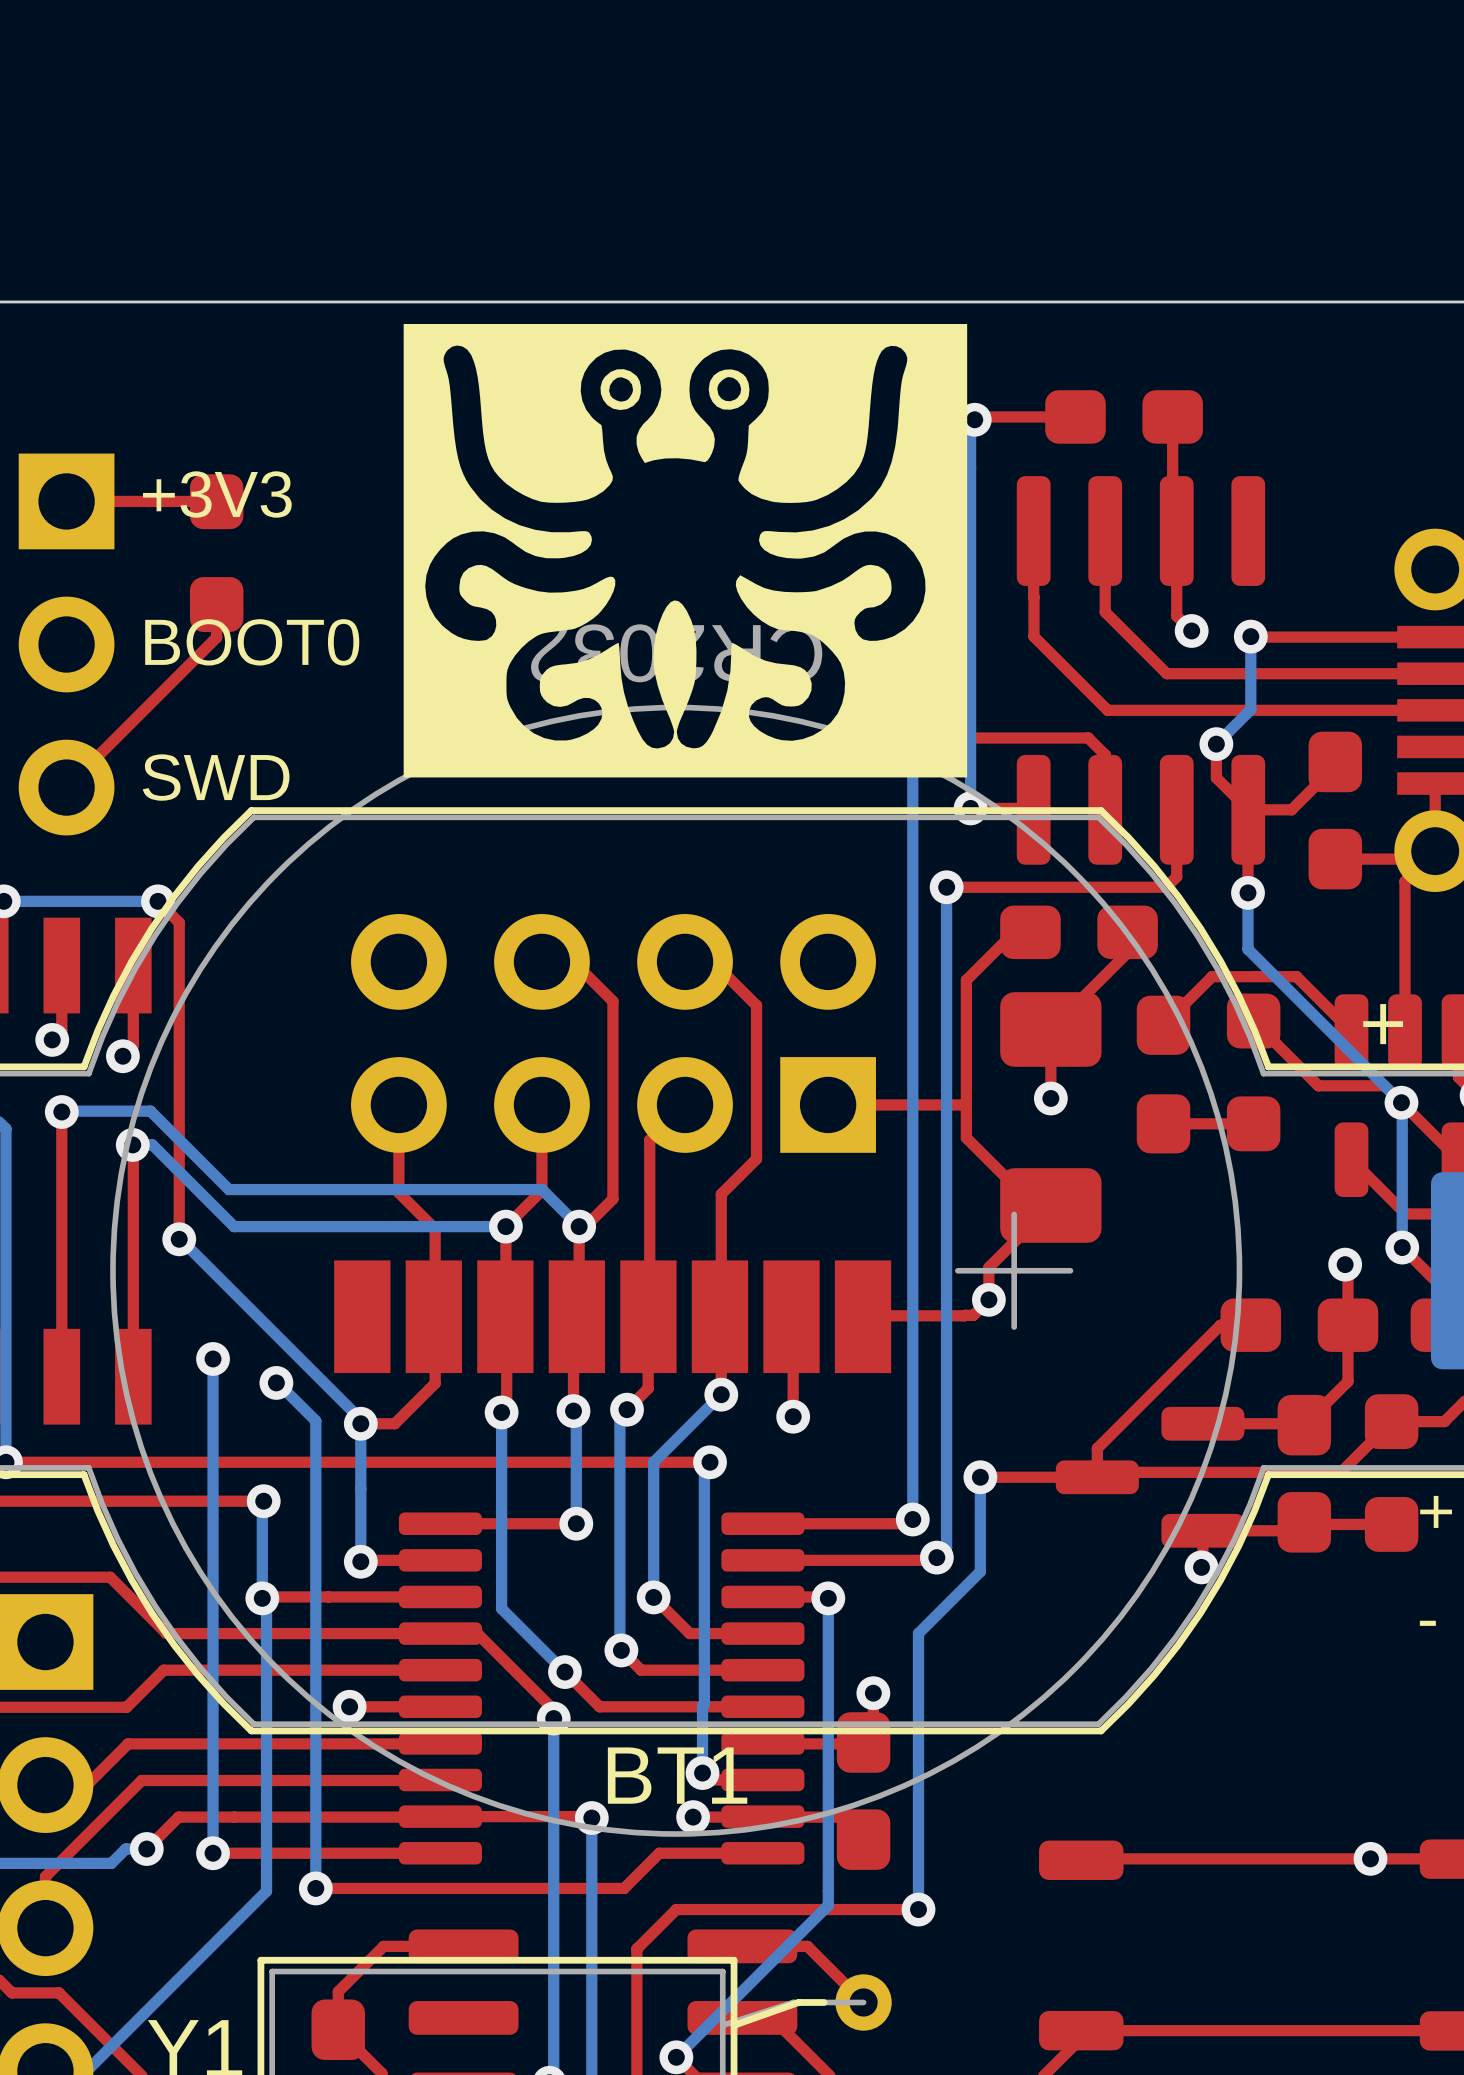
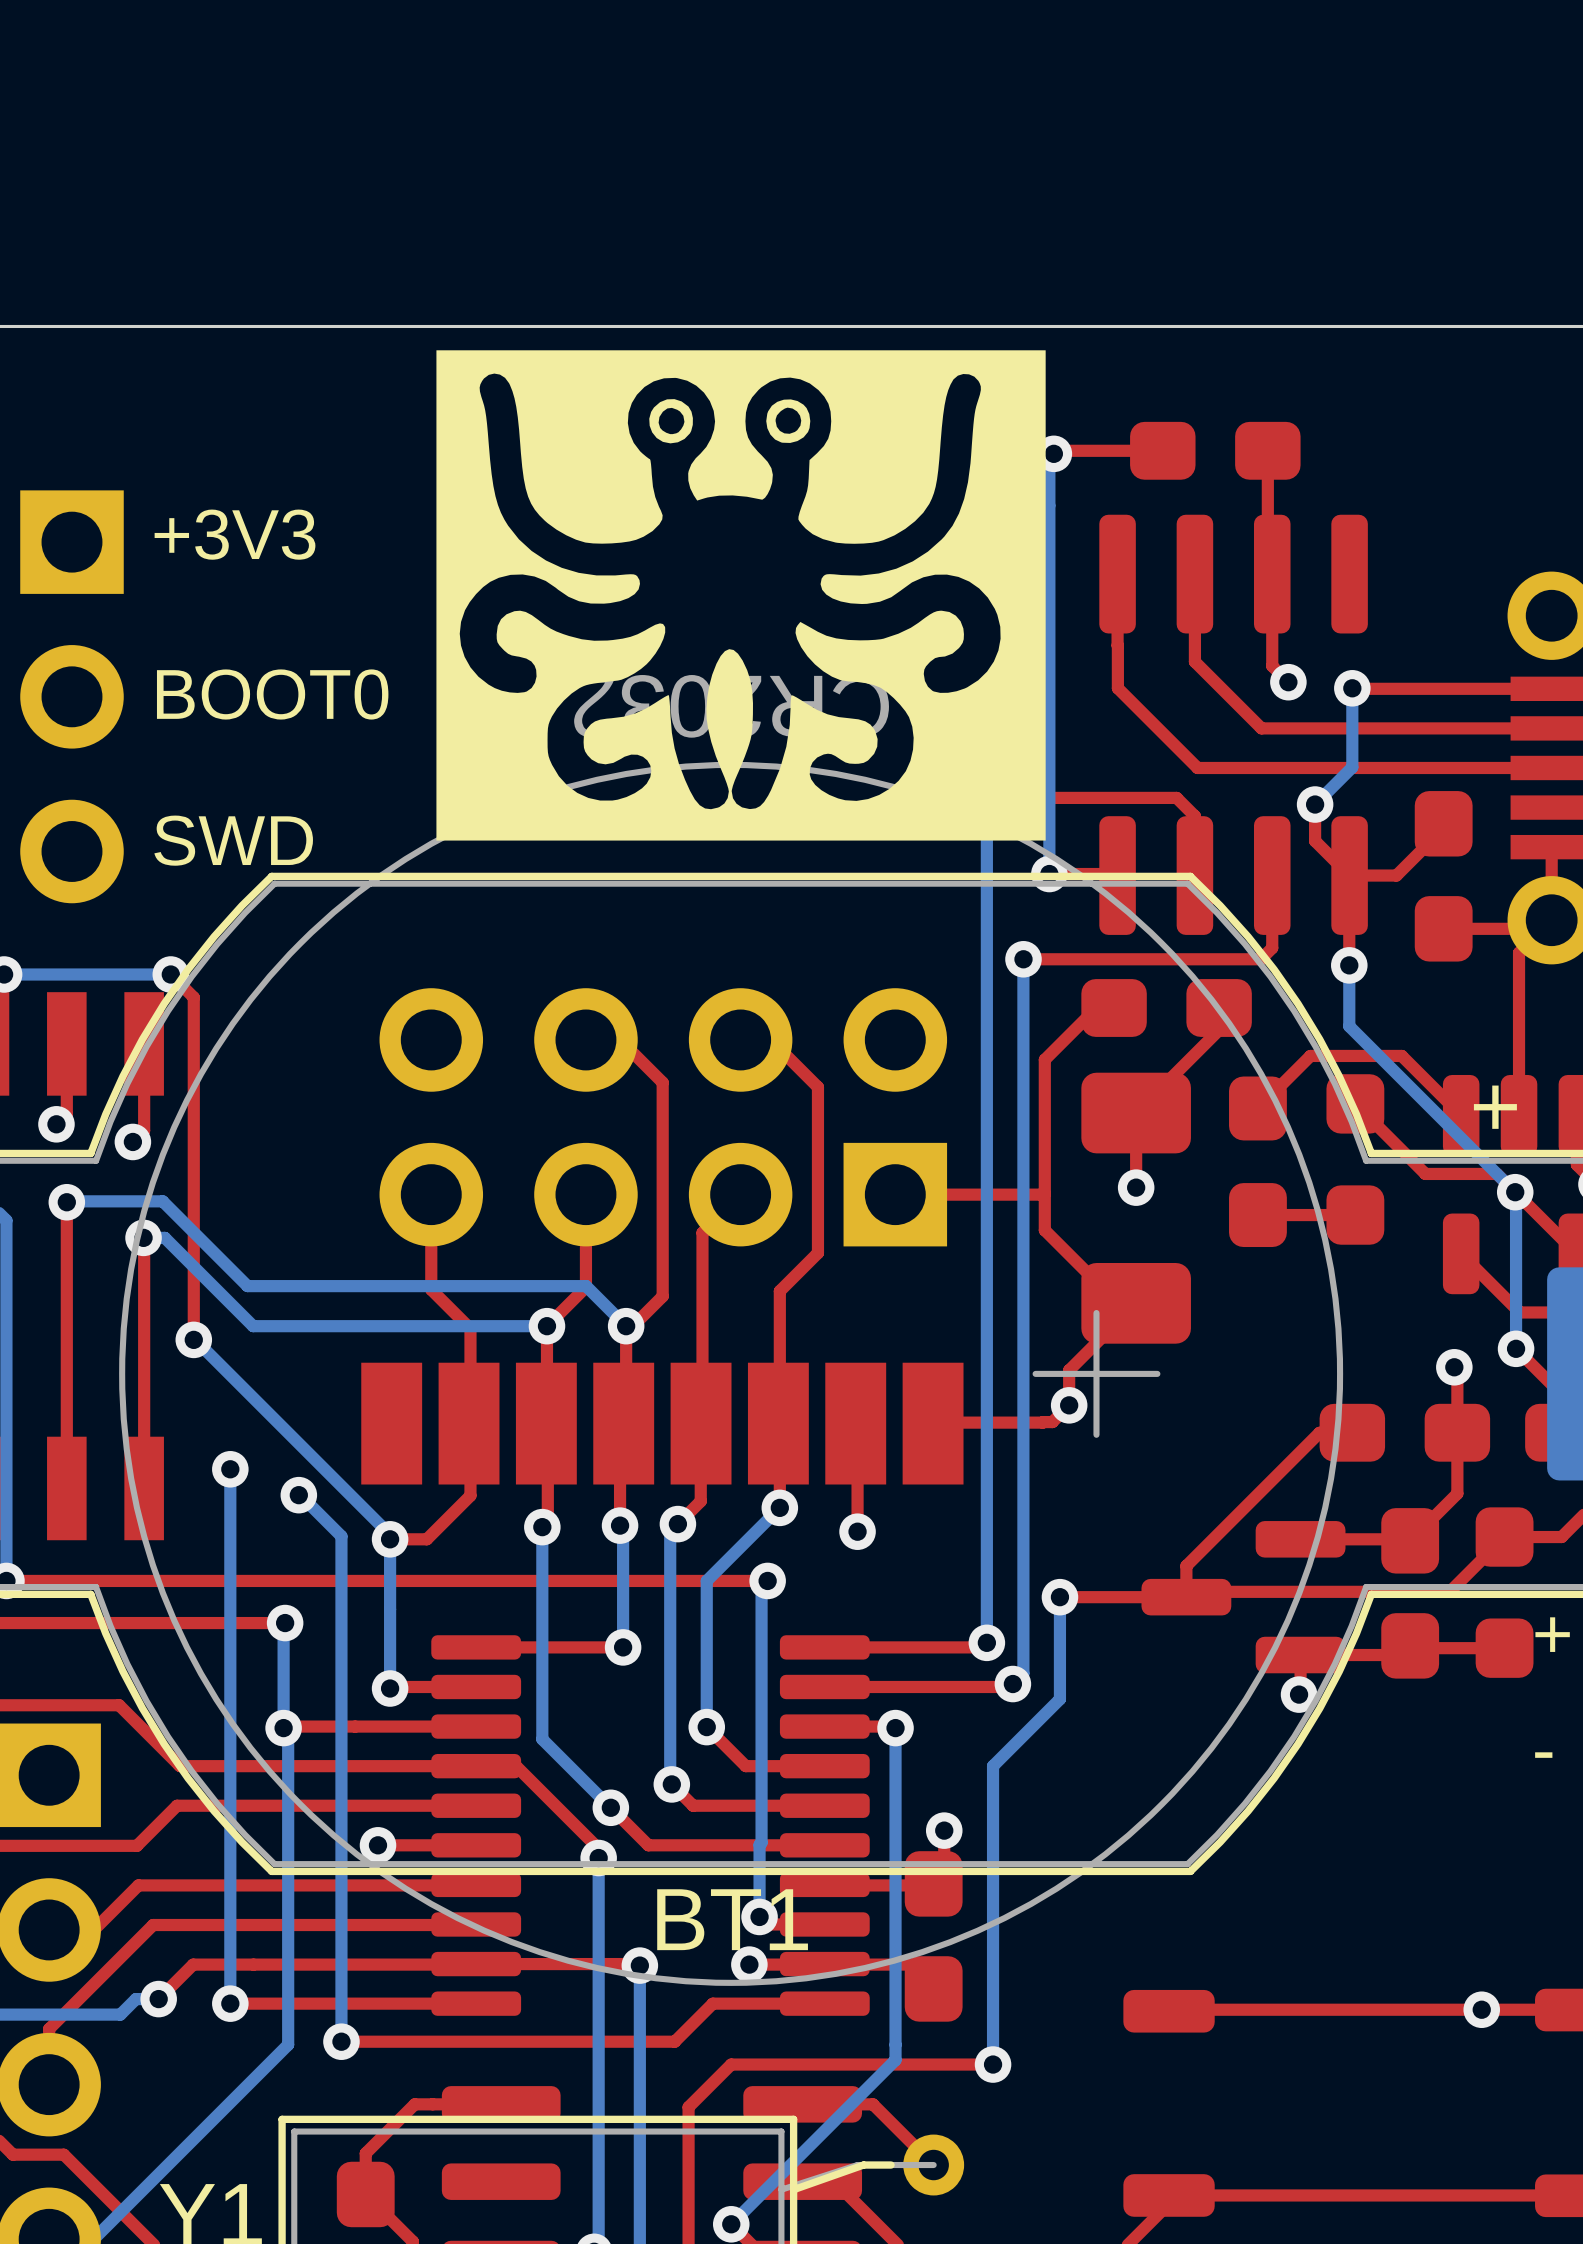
top track: (216, 501) (66, 501) -> none
part: (216, 553) -> none
top track: (216, 604) (216, 637) (66, 787) -> none

